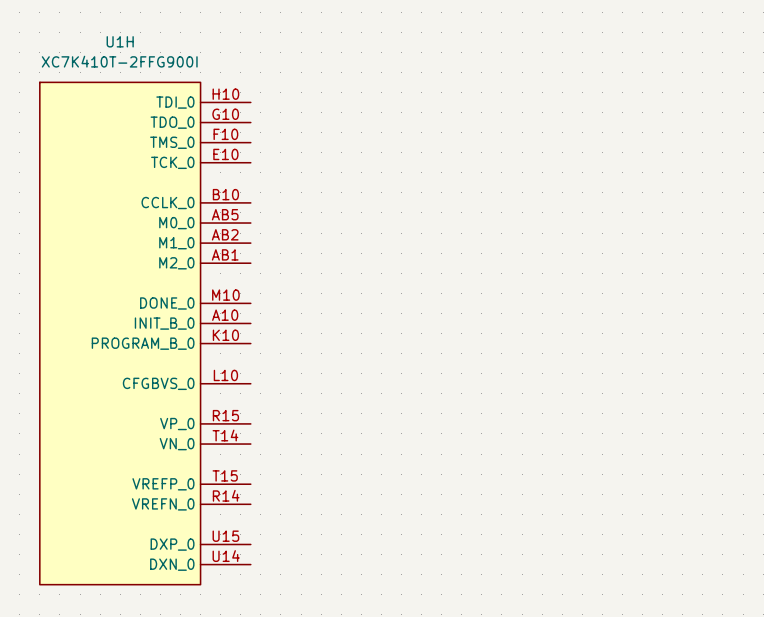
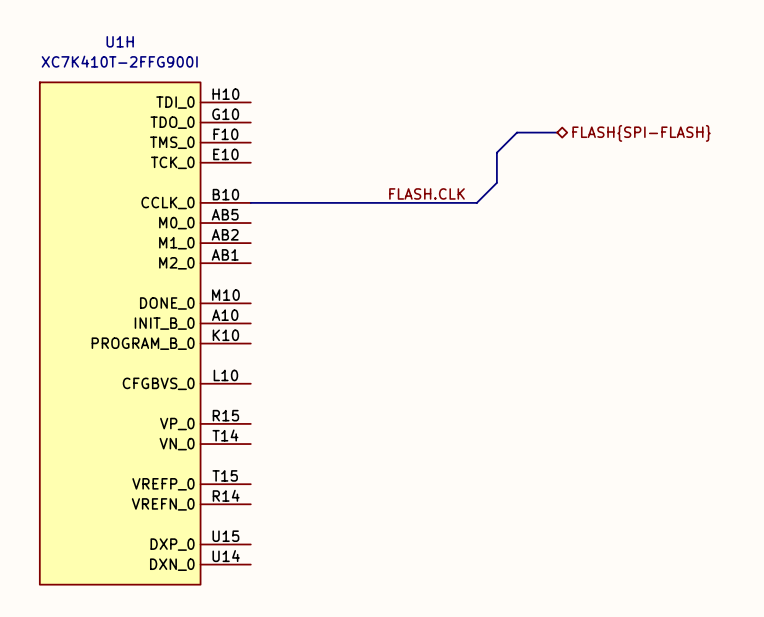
bus: none -> (557, 132) (517, 132) (496, 152) (496, 182)
hierarchical label: none -> FLASH{SPI-FLASH} (641, 133)
wire: none -> (496, 182) (476, 202)
label: none -> FLASH.CLK (427, 193)
wire: none -> (250, 202) (476, 202)

